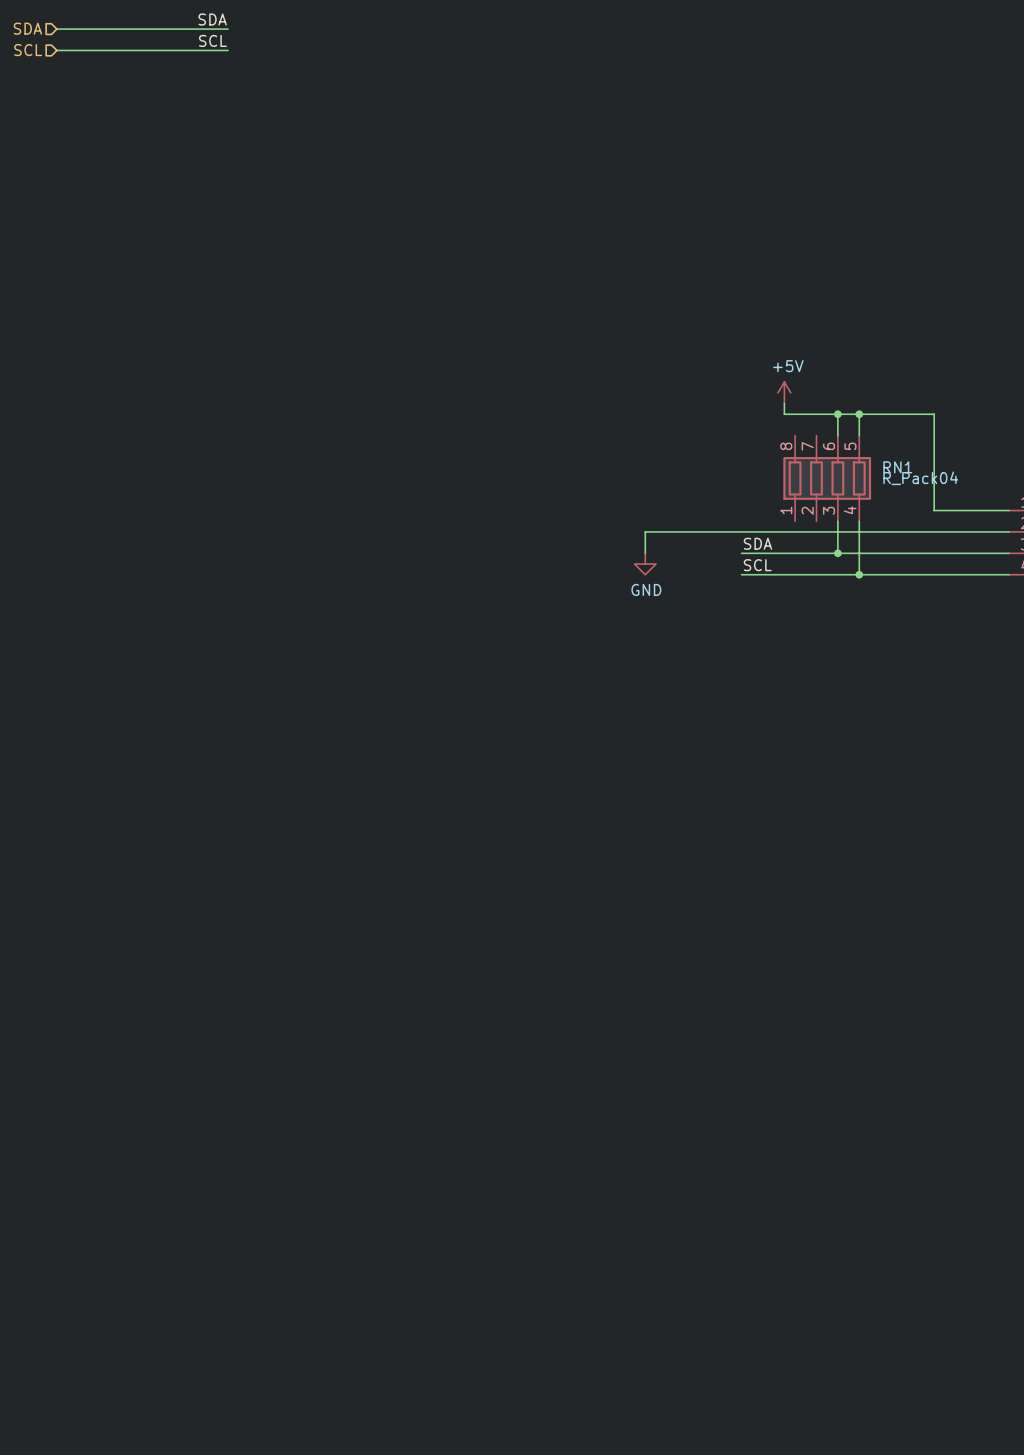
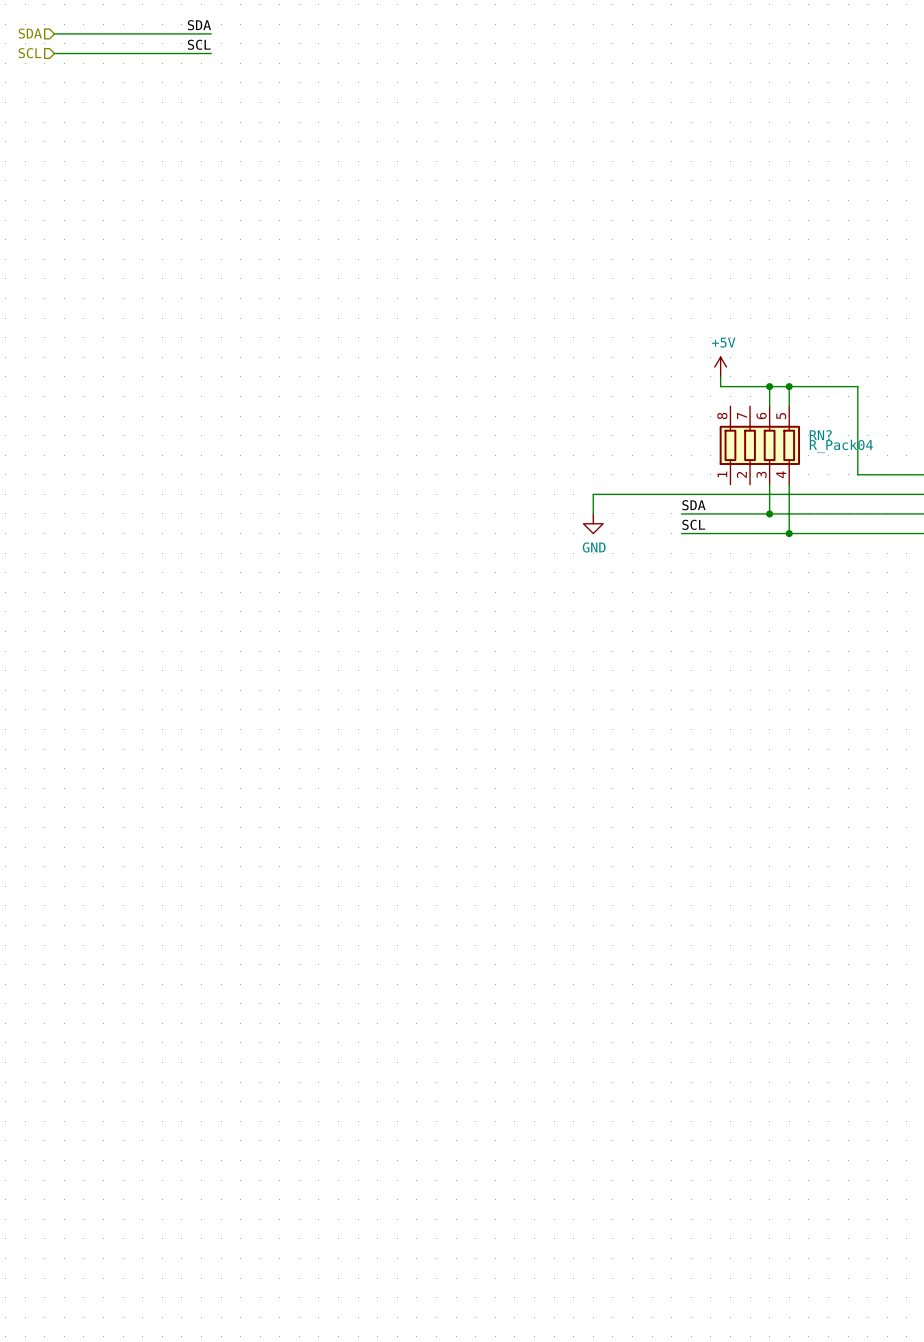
RN1 name: RN1 (897, 467) -> RN? (820, 435)

